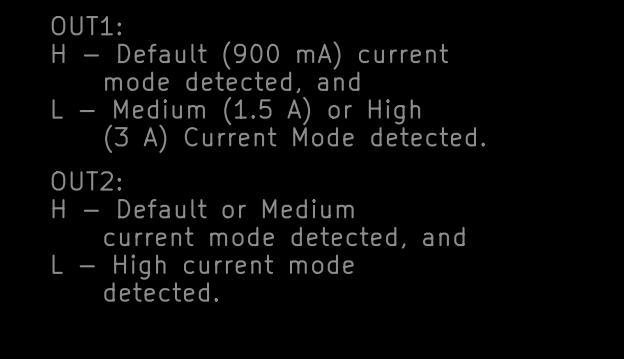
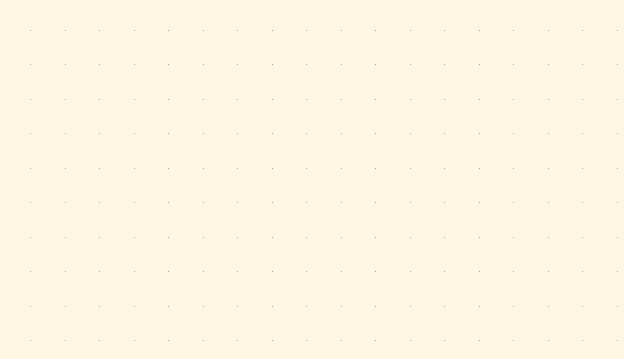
text: OUT1: (86, 25) -> none
text: H - Default (900 mA) current (250, 55) -> none
text: mode detected, and (232, 82) -> none
text: L - Medium (1.5 A) or High (236, 111) -> none
text: (3 A) Current Mode detected. (295, 138) -> none
text: OUT2: (86, 180) -> none
text: H - Default or Medium (203, 208) -> none
text: current mode detected, and (284, 237) -> none
text: L - High current mode (203, 267) -> none
text: detected. (161, 292) -> none

